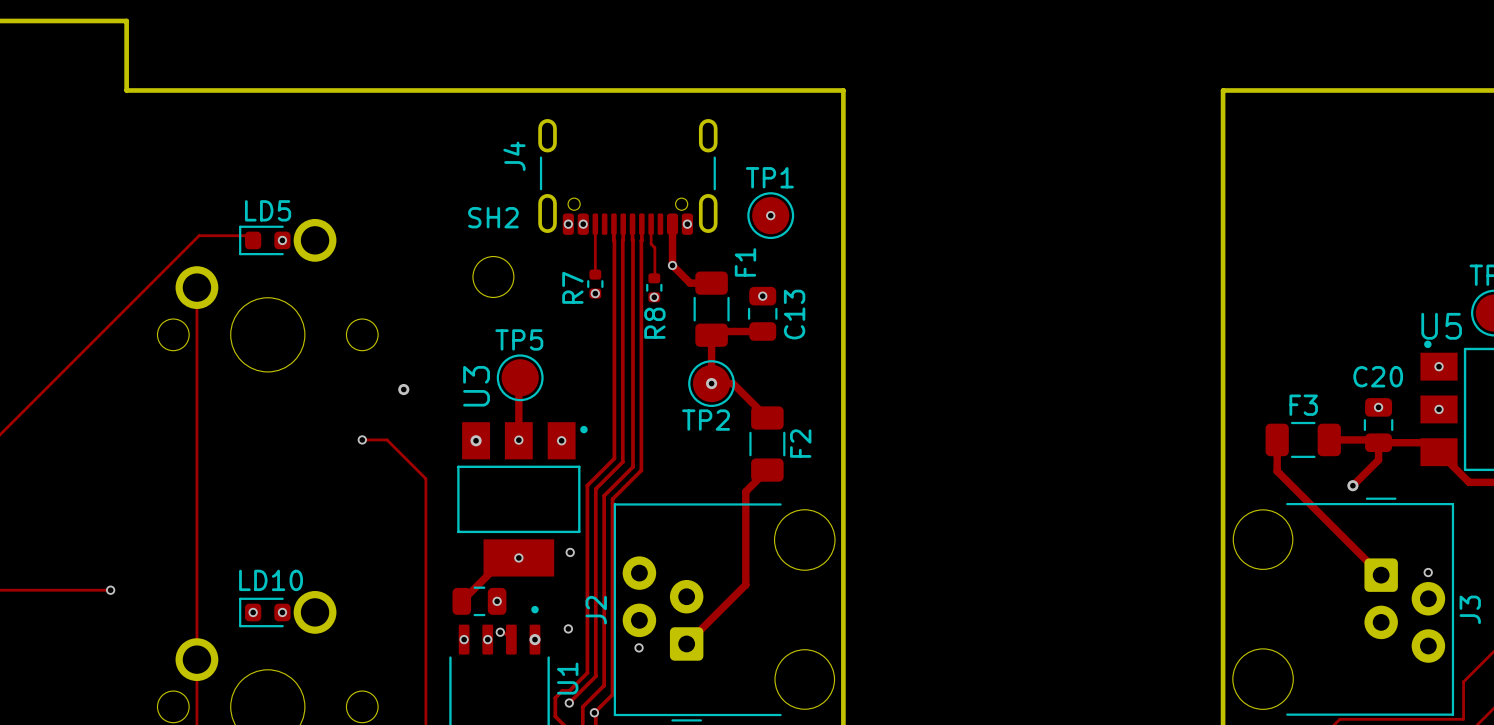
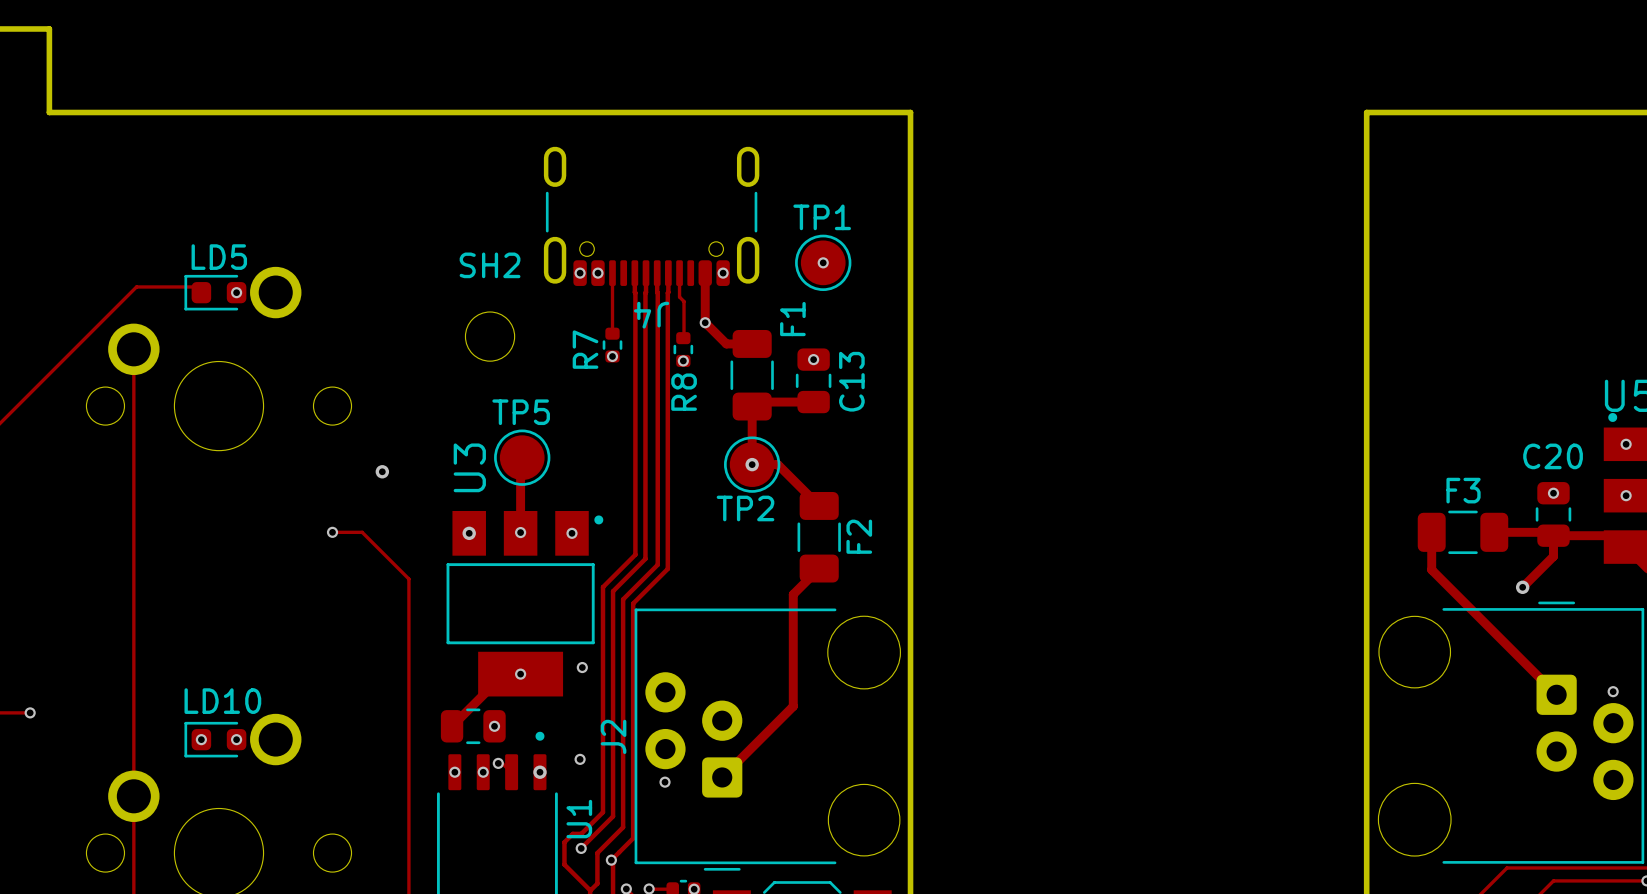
J4 name rotation: 0° (514, 156) -> 90° counterclockwise (651, 315)
J4 name position: J4 (514, 156) -> J4 (651, 315)

